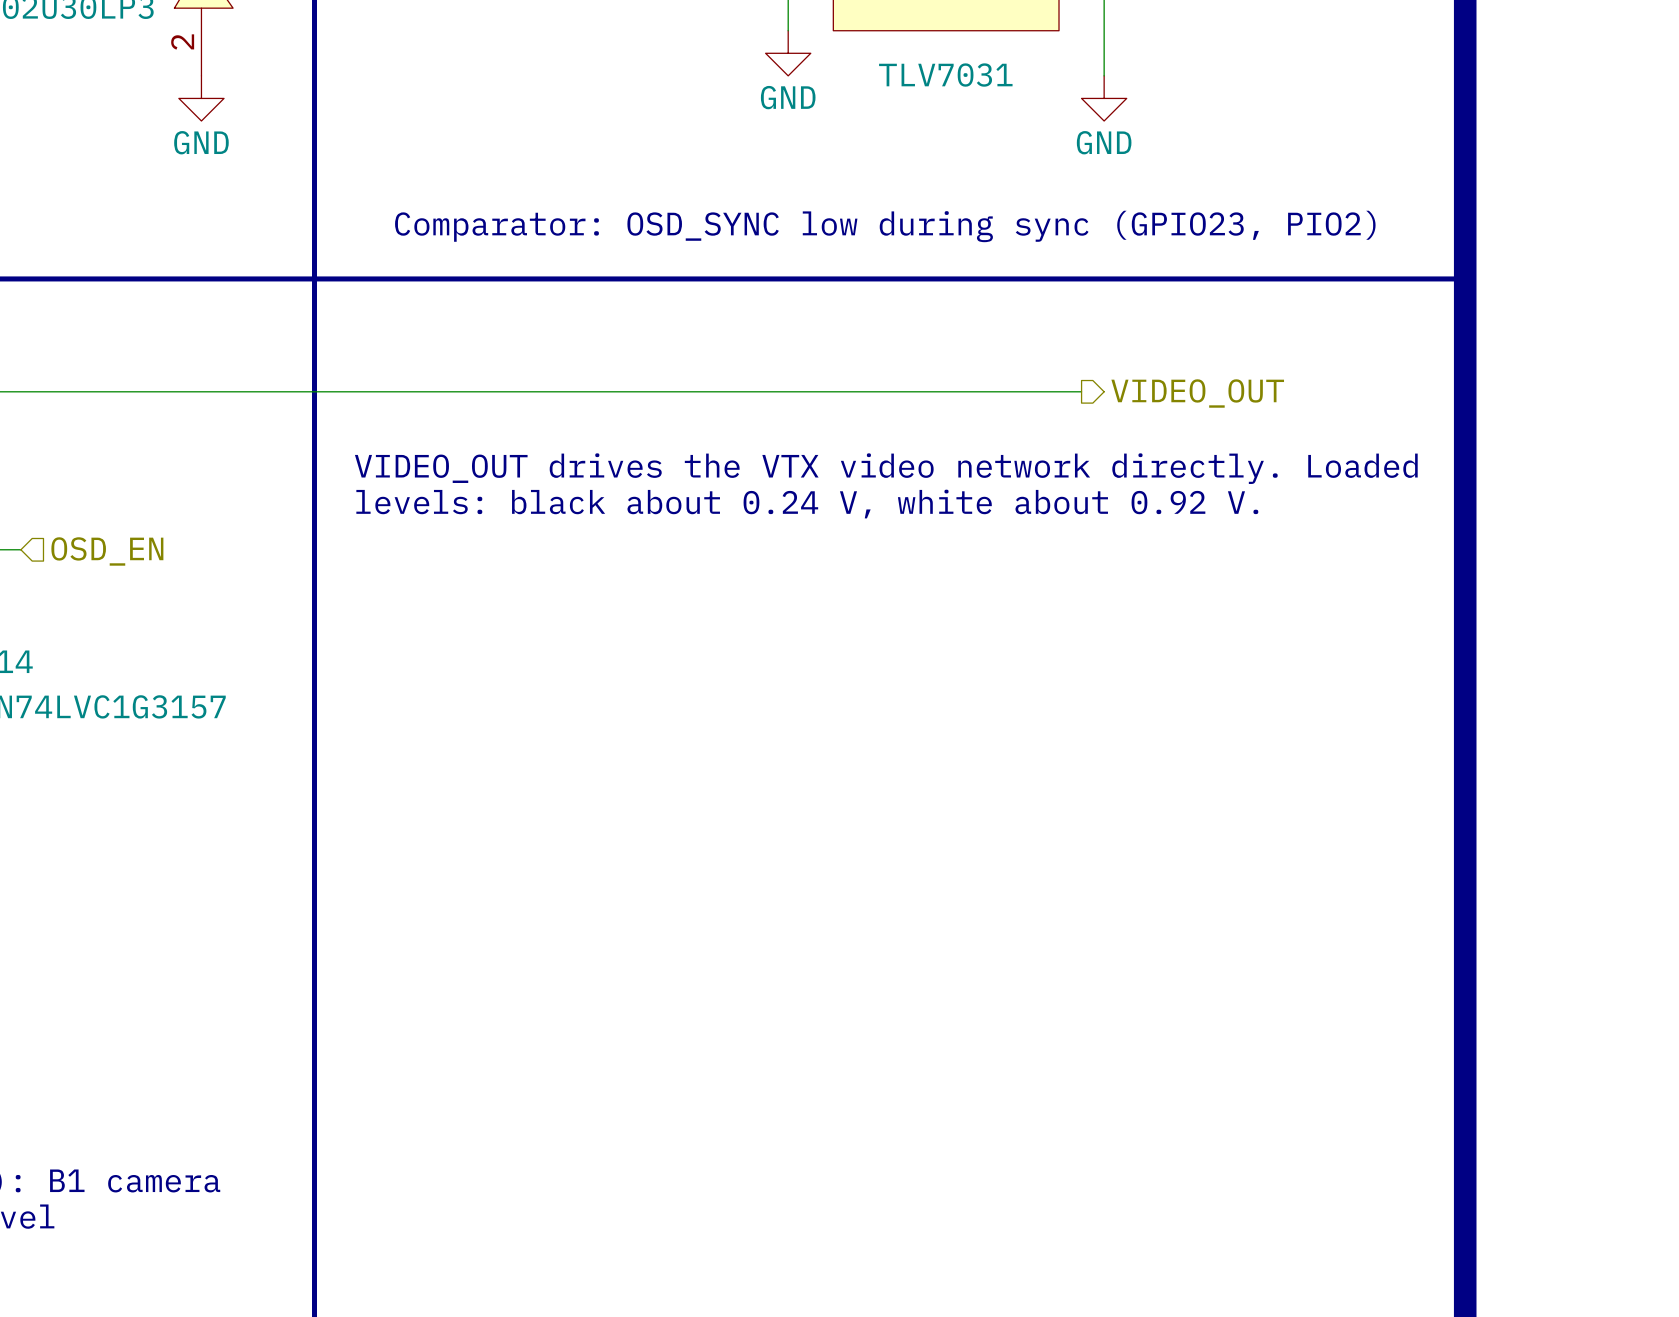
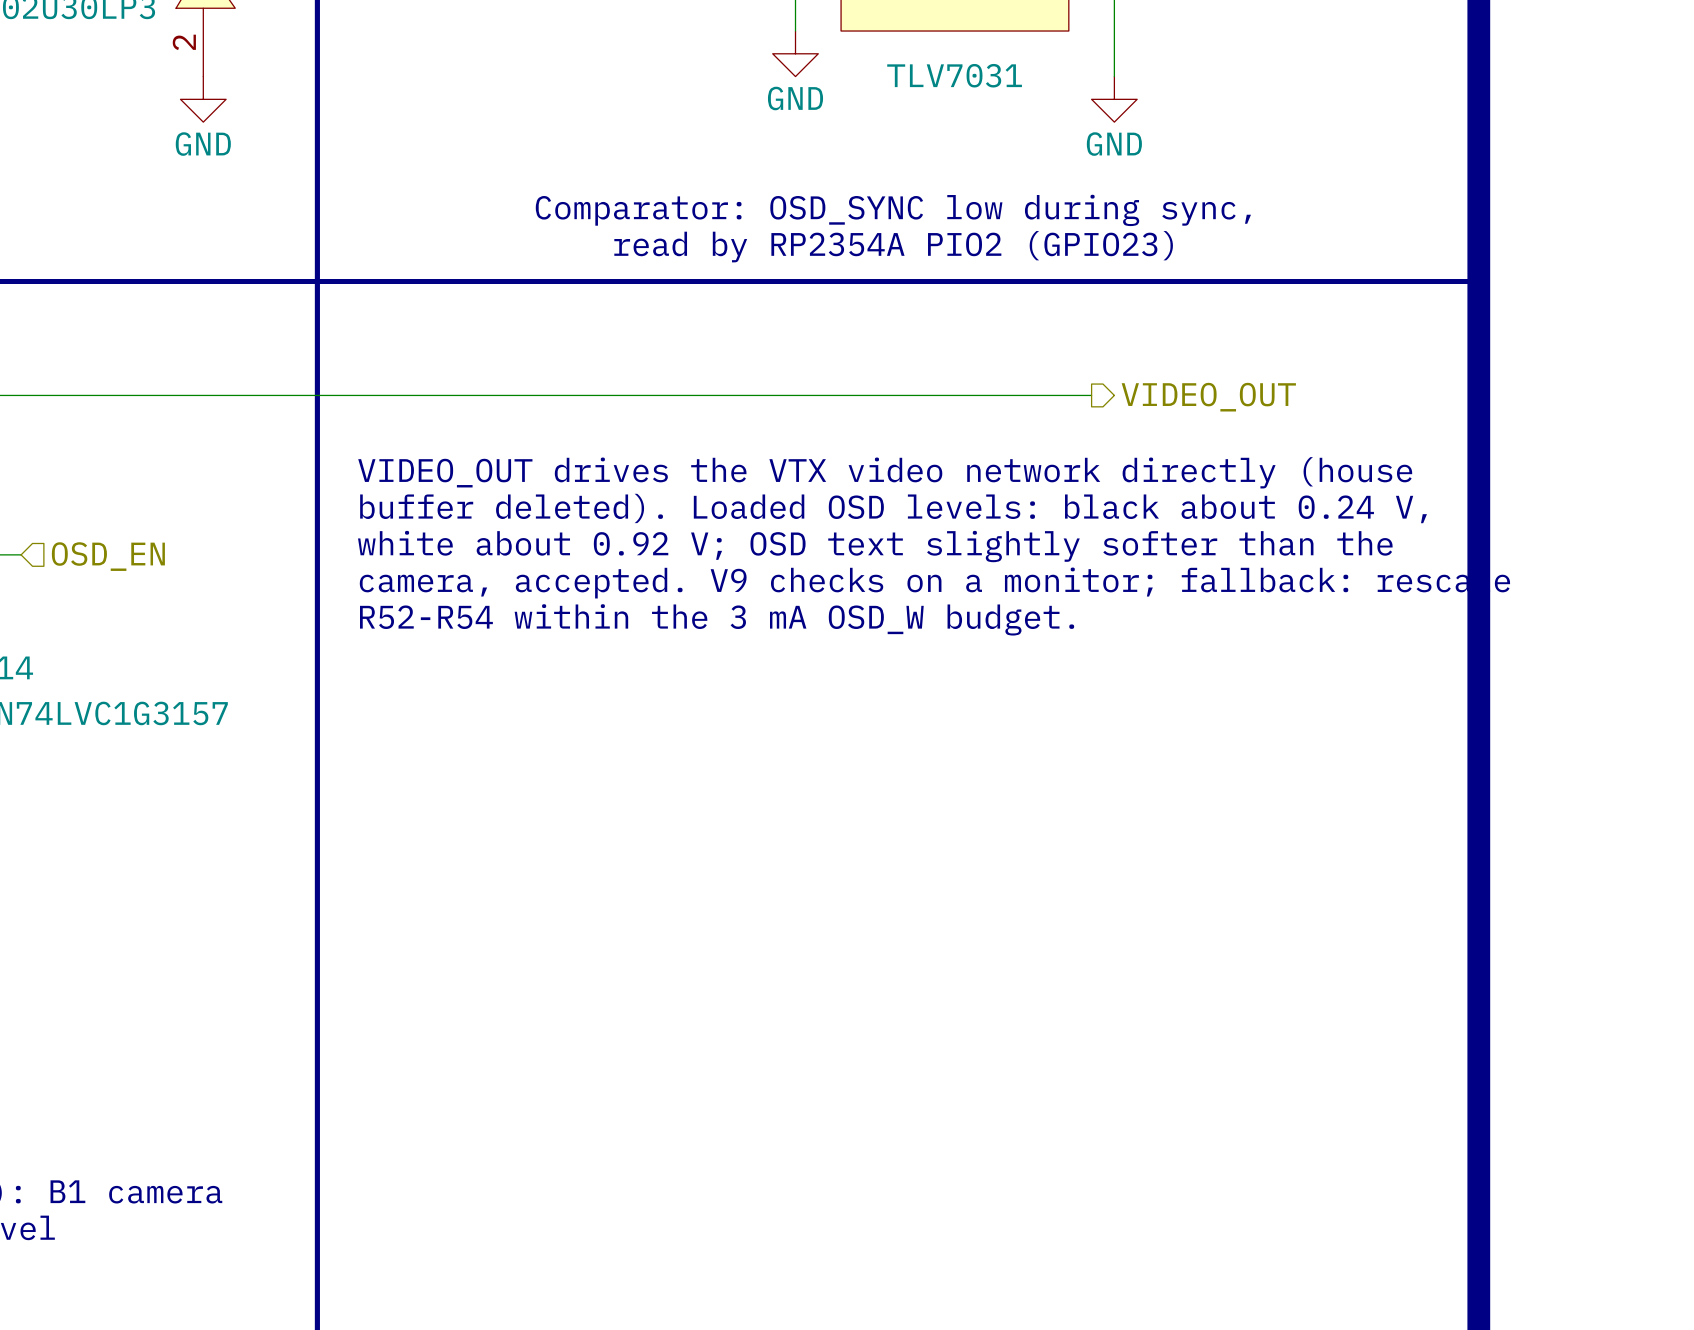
text: Comparator: OSD_SYNC low during sync (GPIO23, PIO2) (885, 226) -> Comparator: OSD_SYNC low during sync, (893, 210)
text: none -> read by RP2354A PIO2 (GPIO23) (893, 246)
text: VIDEO_OUT drives the VTX video network directly. Loaded (886, 468) -> VIDEO_OUT drives the VTX video network directly (house (885, 472)
text: levels: black about 0.24 V, white about 0.92 V. (807, 504) -> buffer deleted). Loaded OSD levels: black about 0.24 V, (893, 508)
text: none -> white about 0.92 V; OSD text slightly softer than the (875, 546)
text: none -> camera, accepted. V9 checks on a monitor; fallback: rescale (934, 583)
text: none -> R52-R54 within the 3 mA OSD_W budget. (717, 619)

